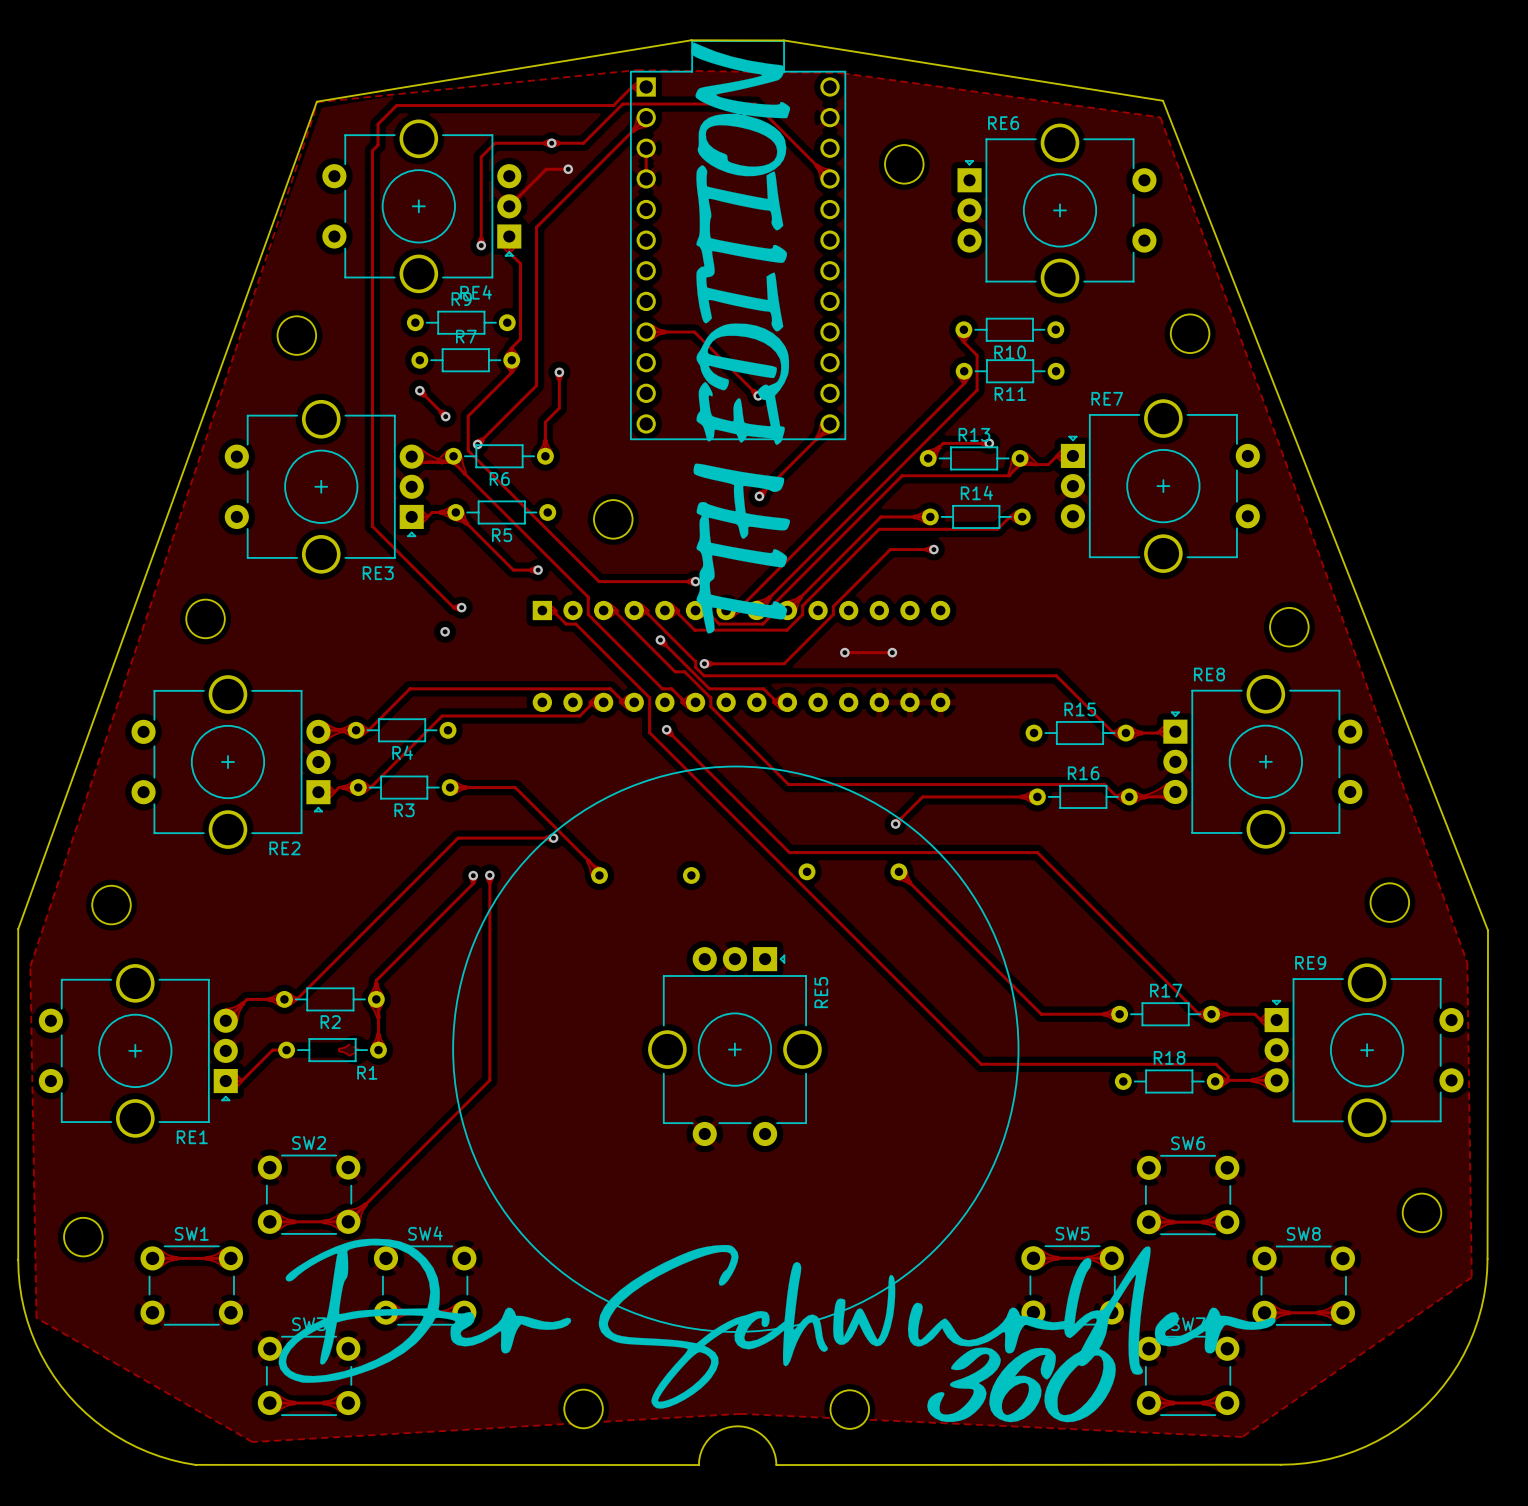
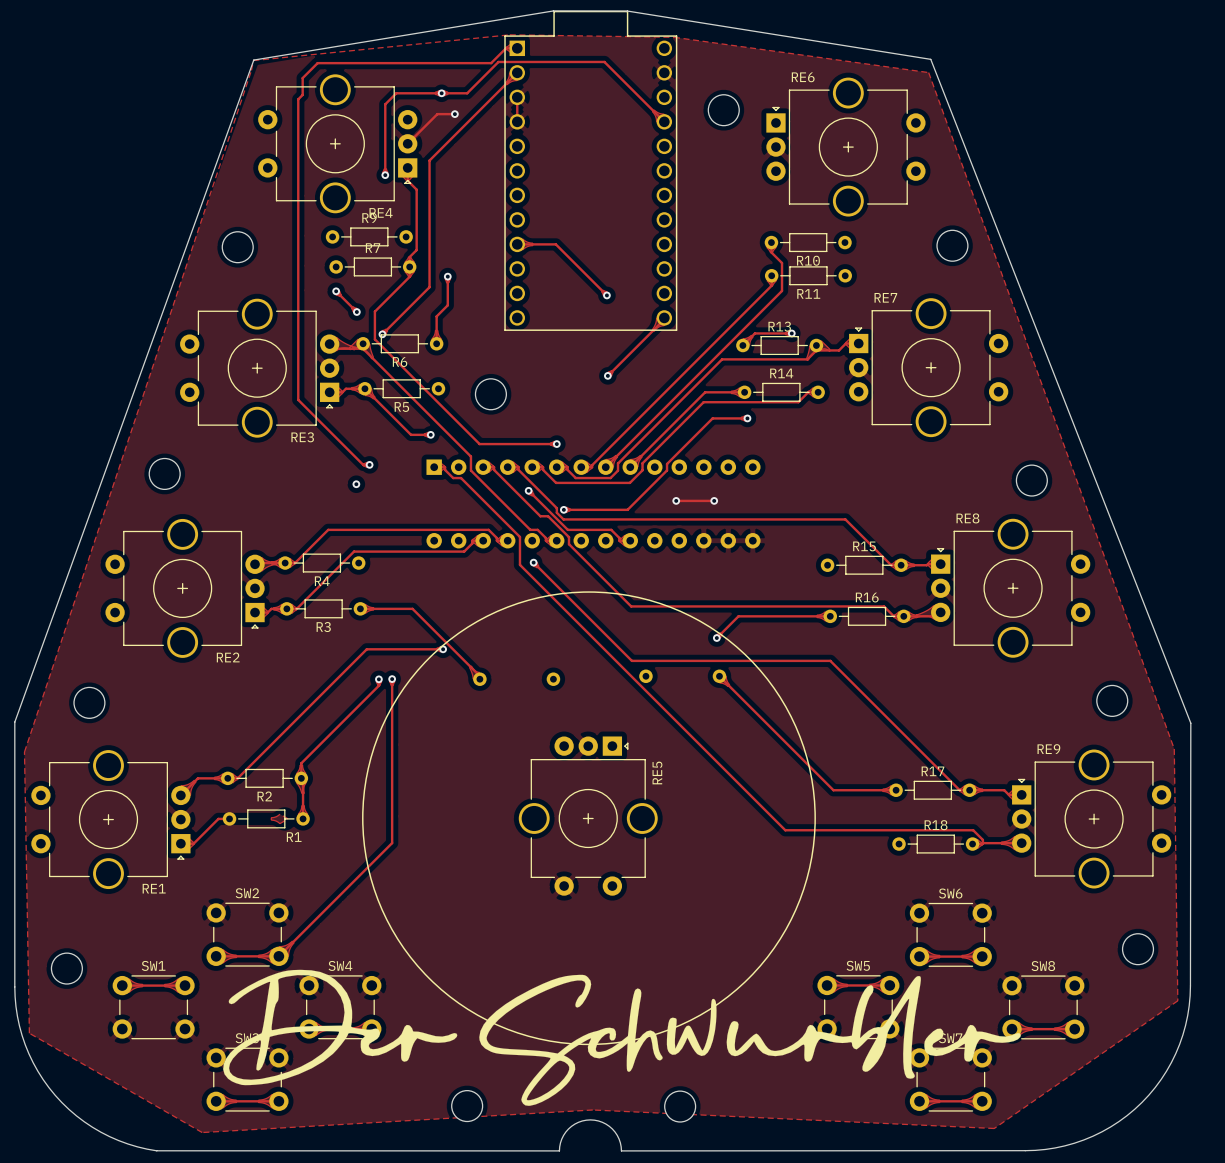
drawing: [691, 42, 791, 634] -> none
drawing: [927, 1347, 1116, 1423] -> none

